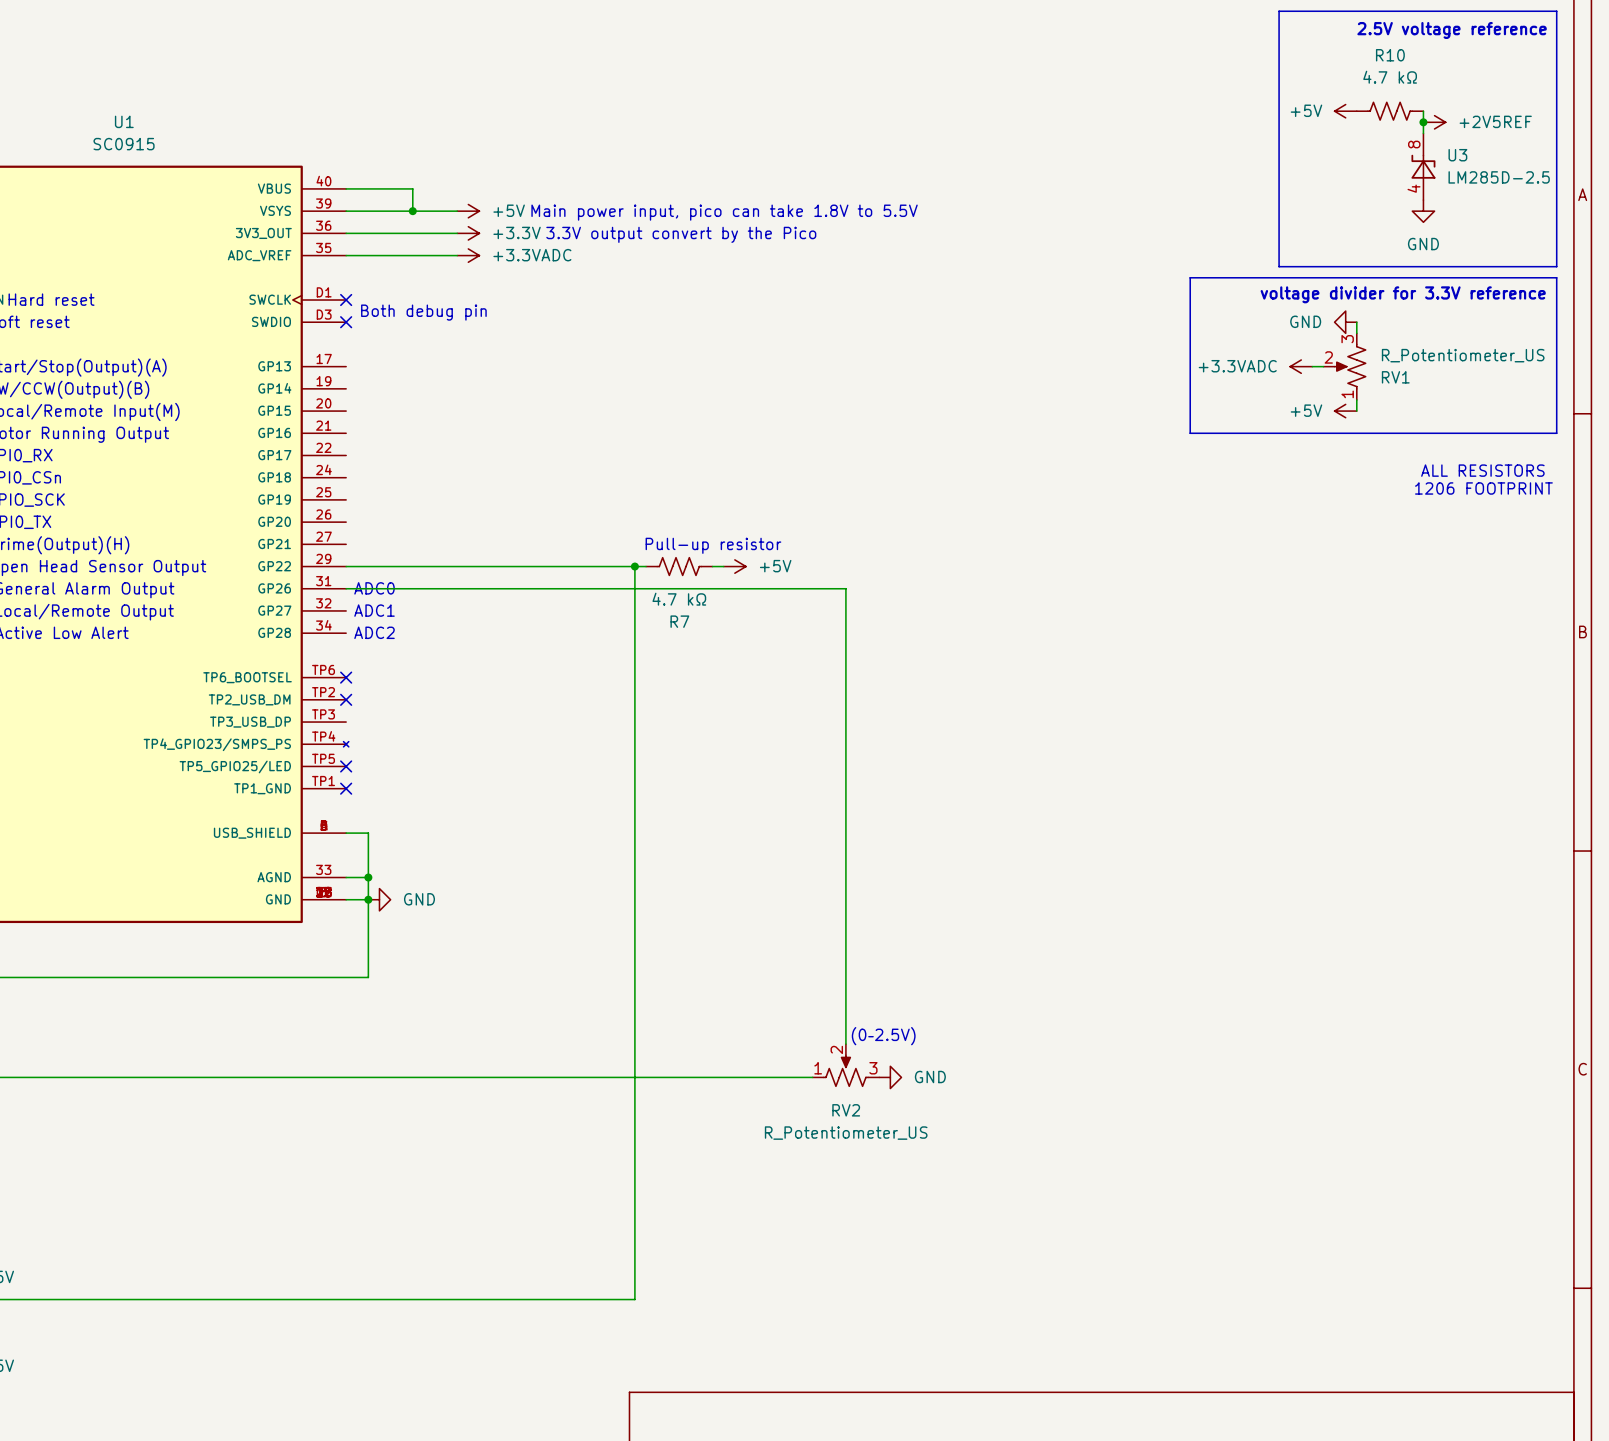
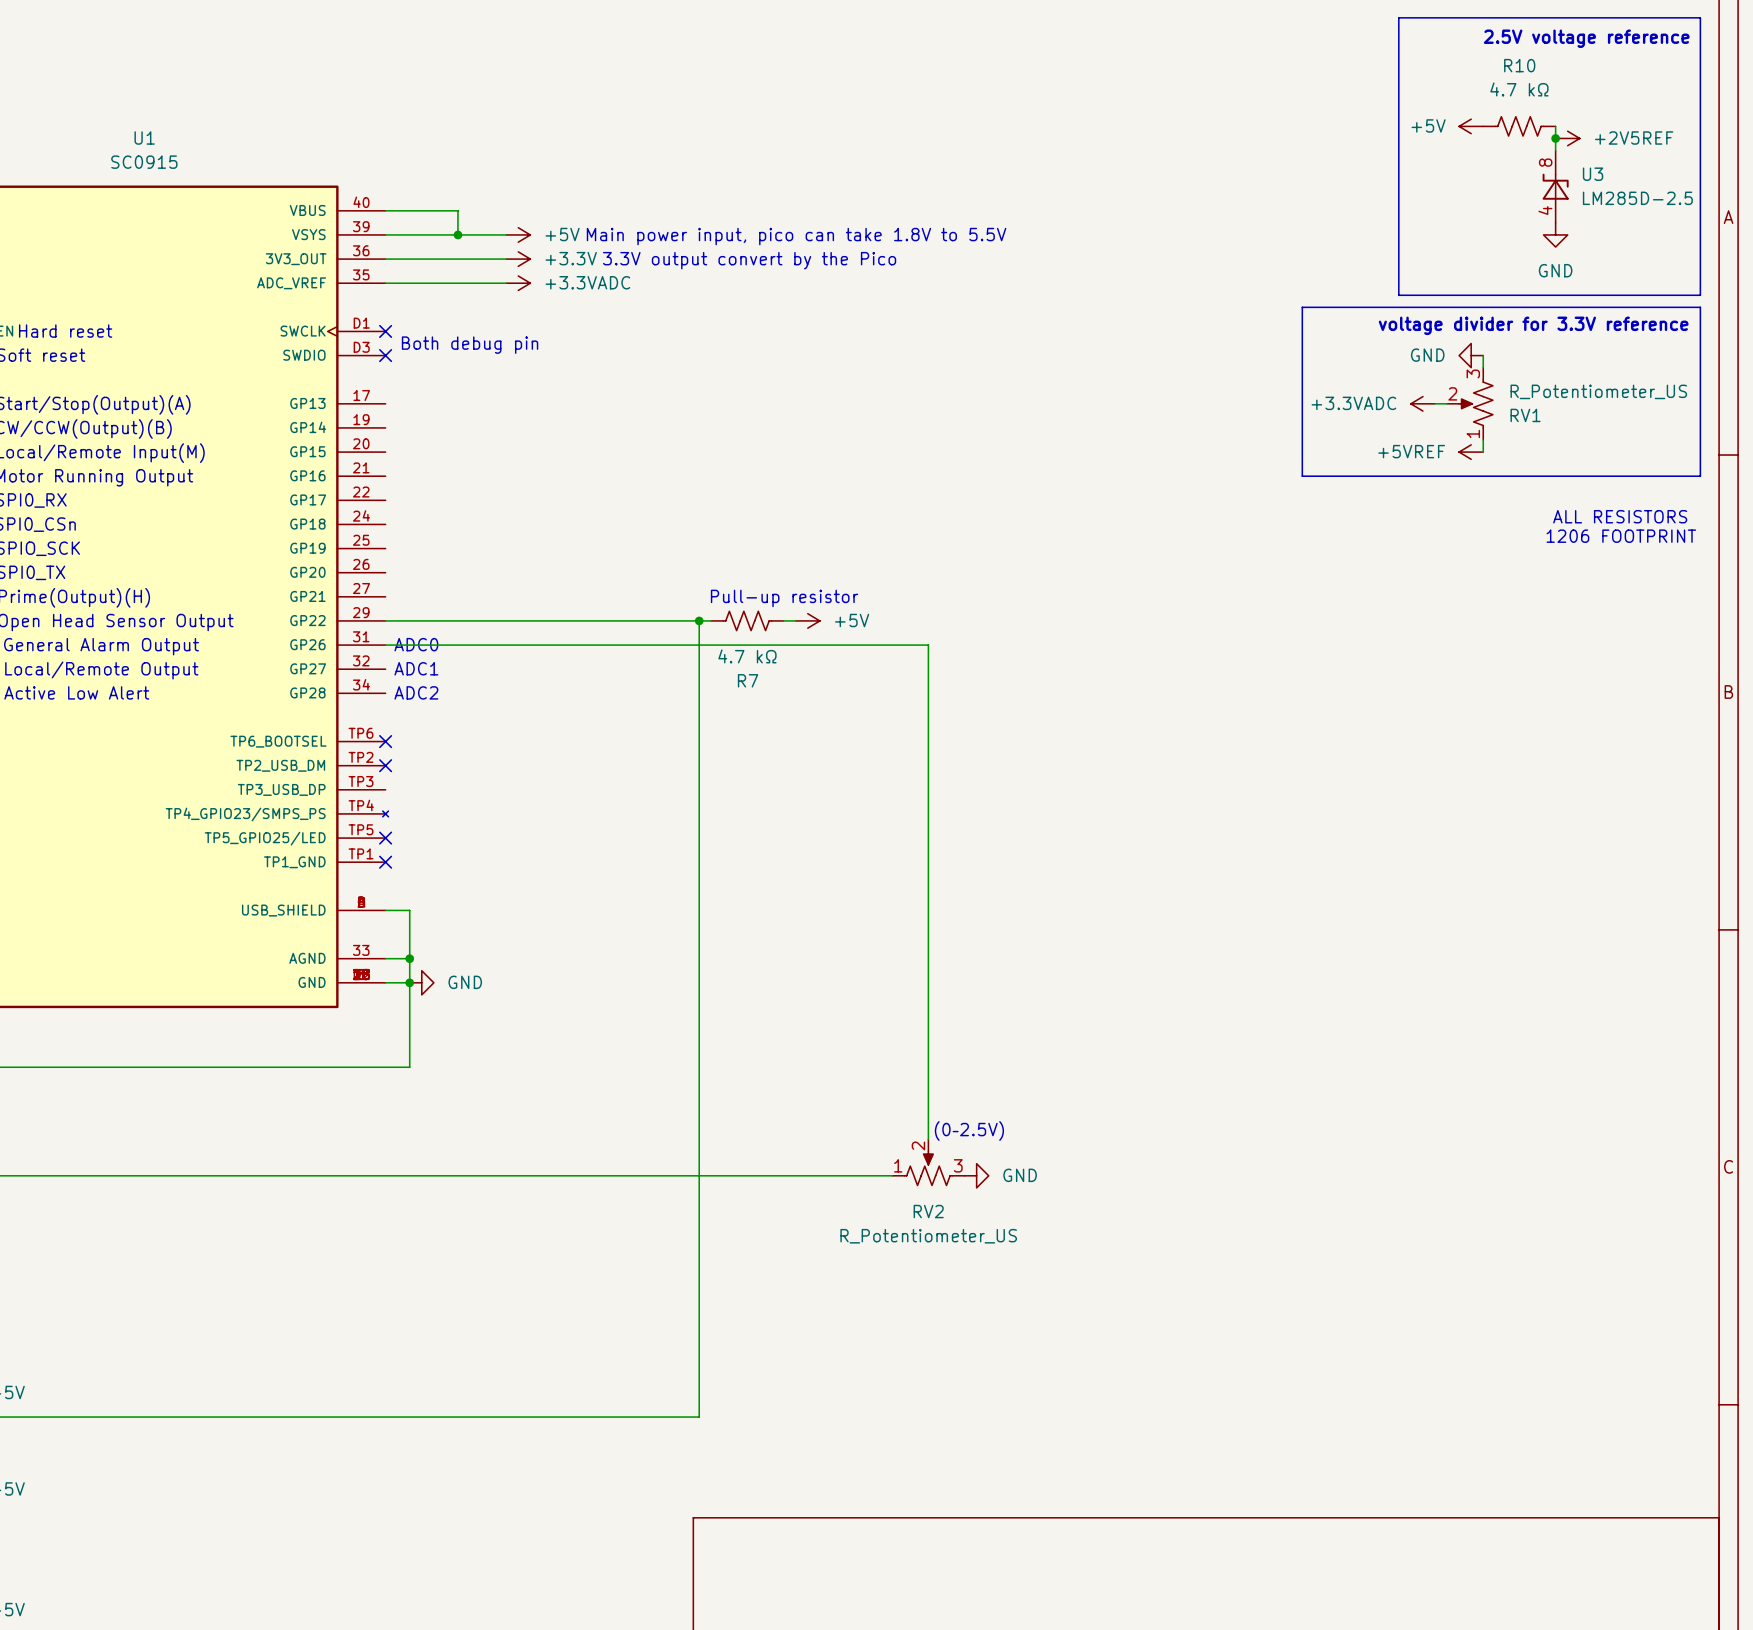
power symbol: +5V (1345, 411) -> +5VREF (1471, 452)

